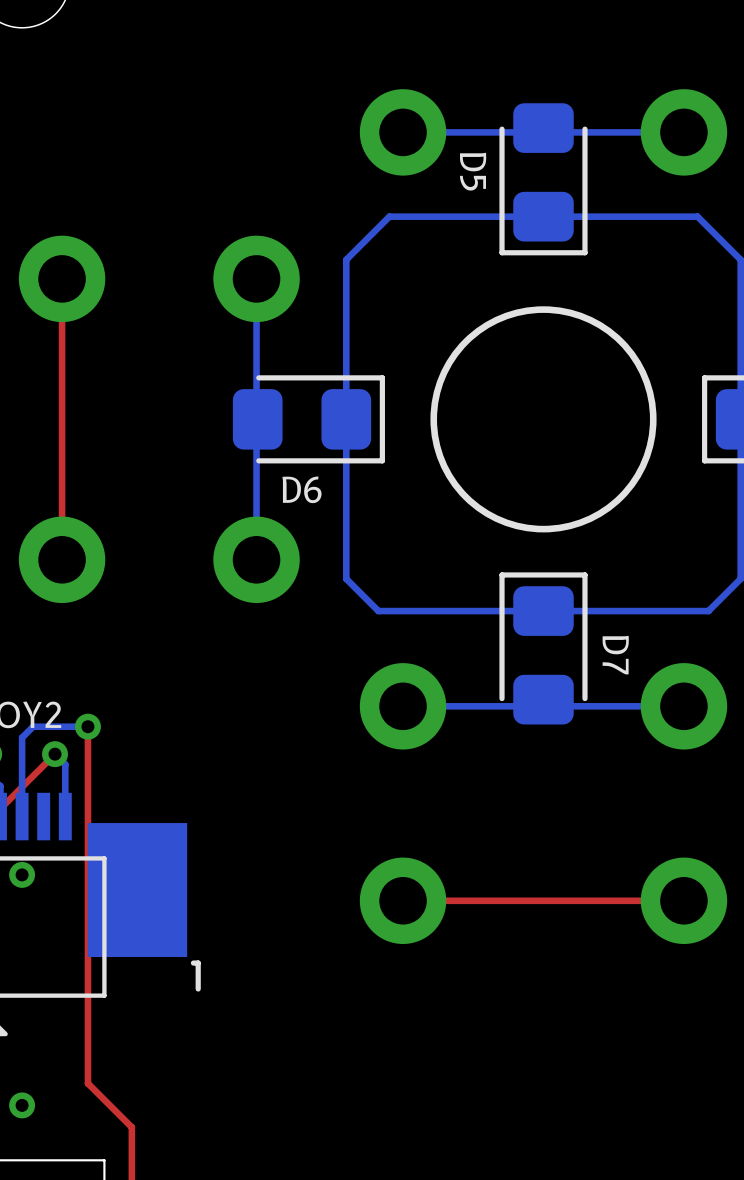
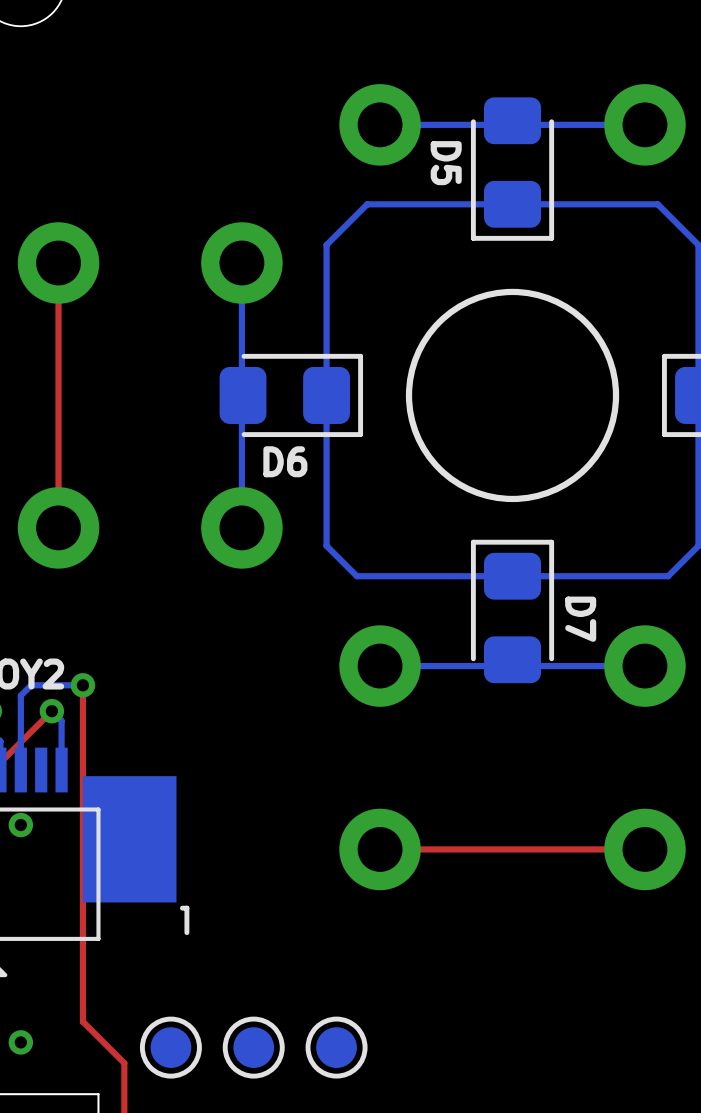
part: none -> (170, 1047)
part: none -> (253, 1047)
part: none -> (336, 1047)

